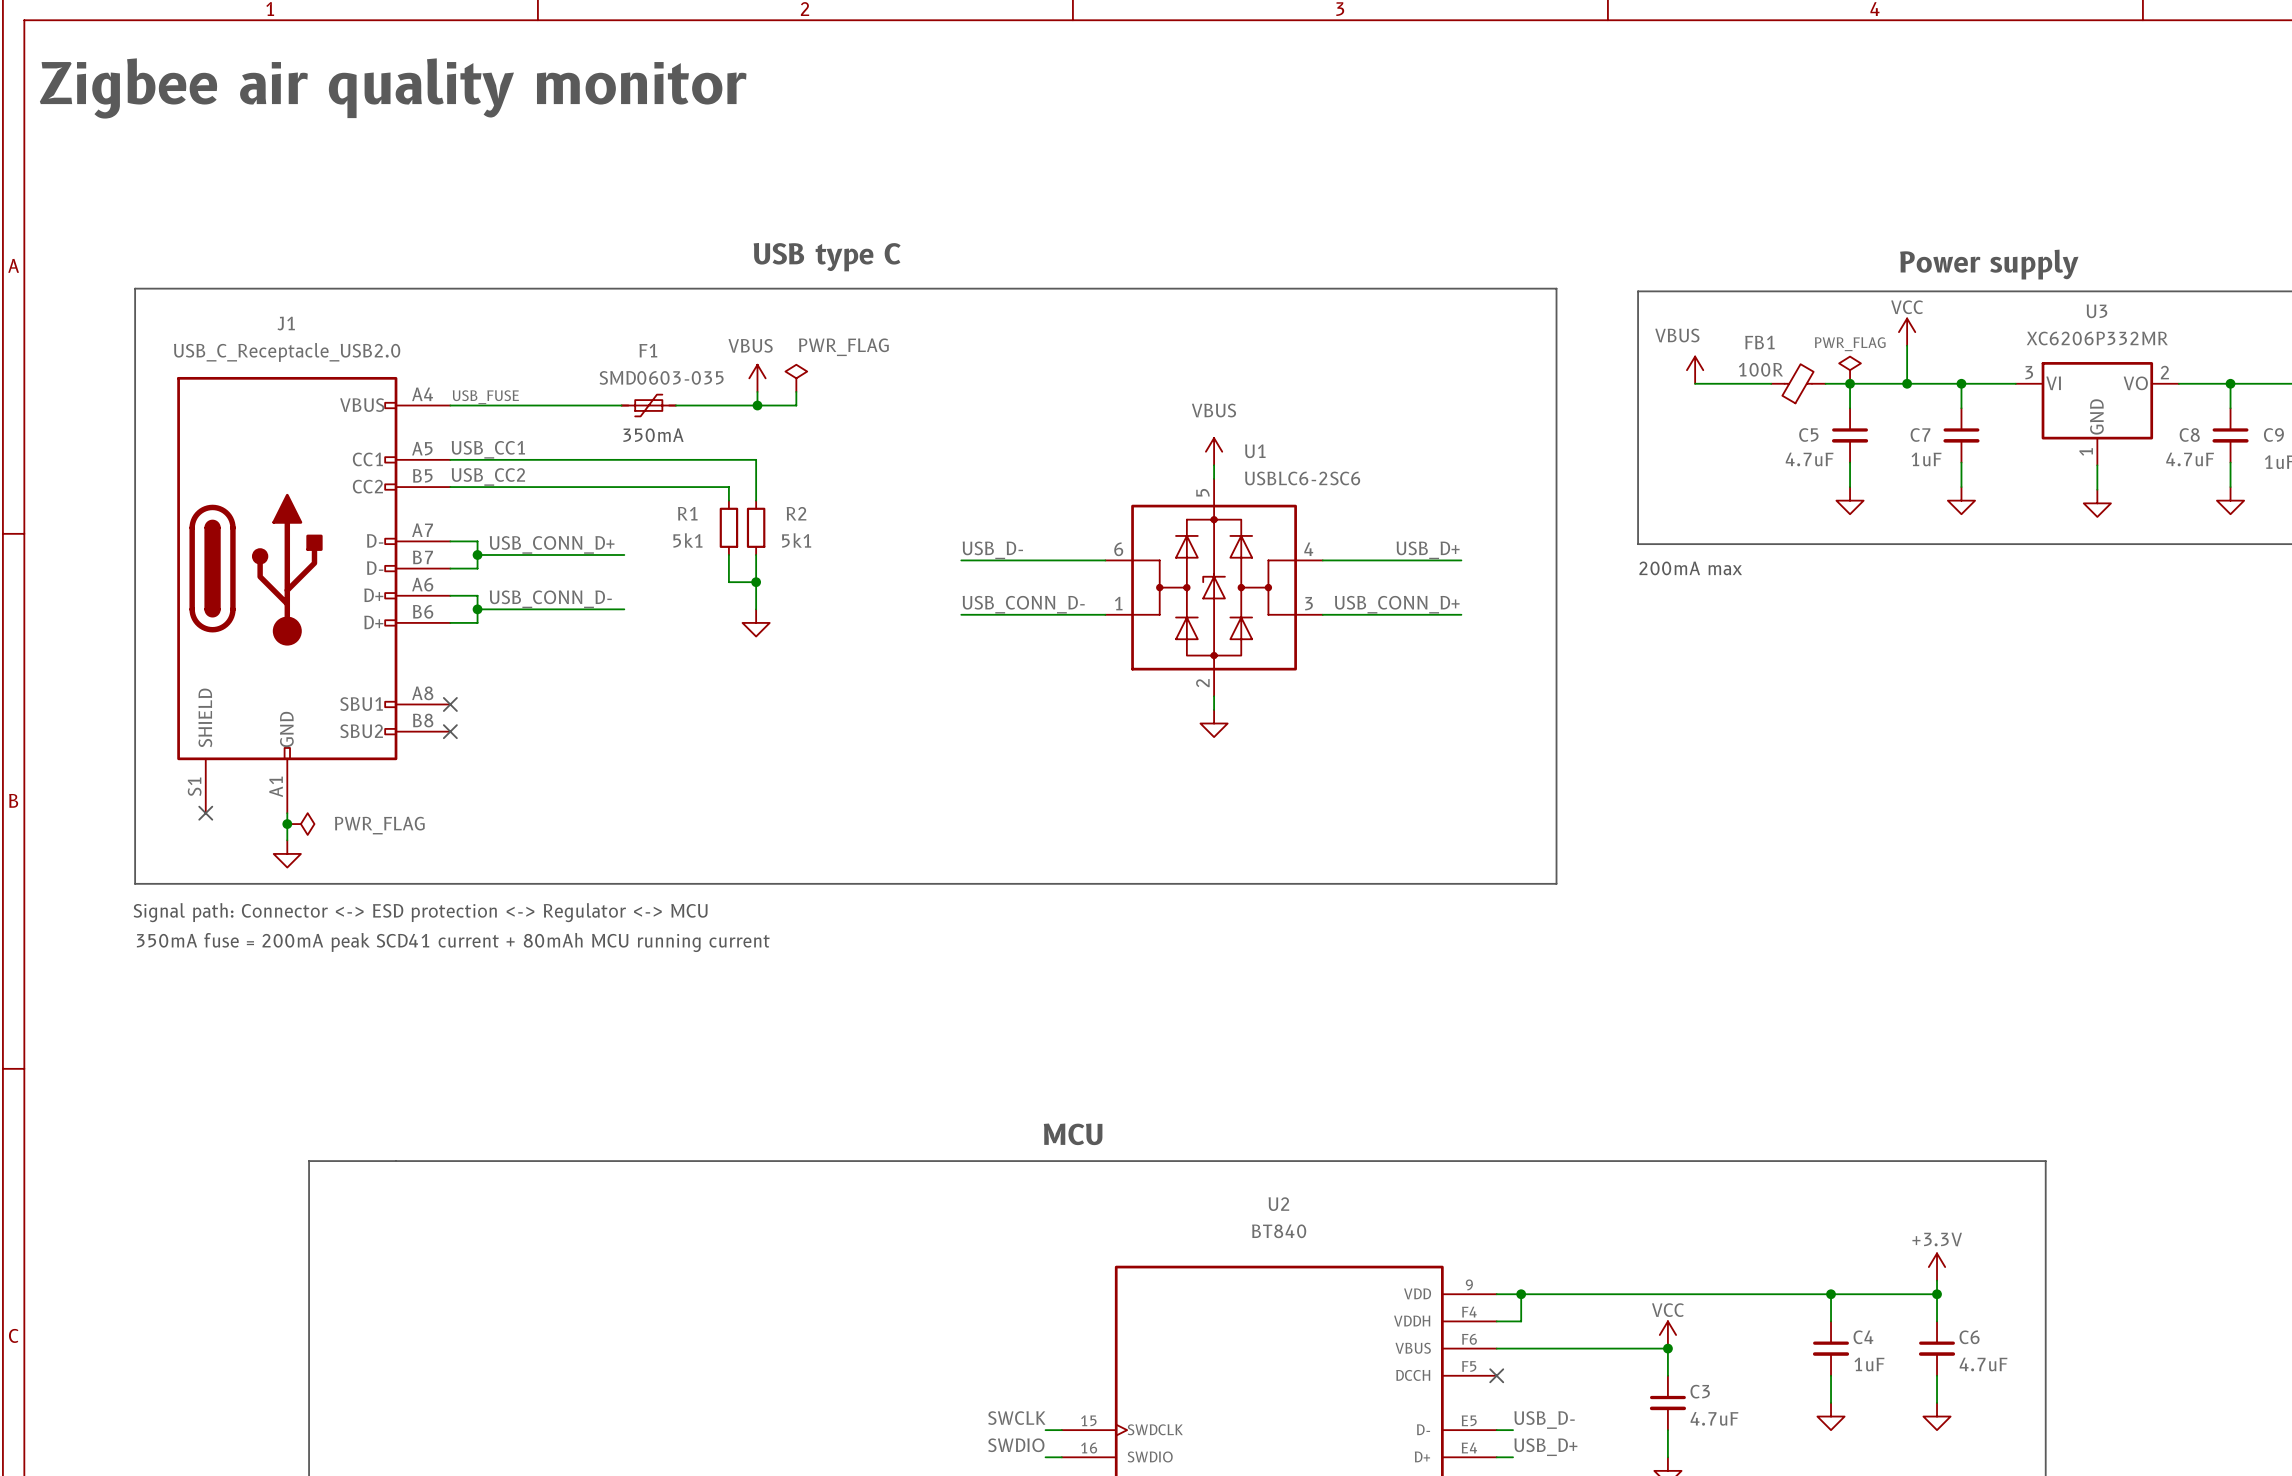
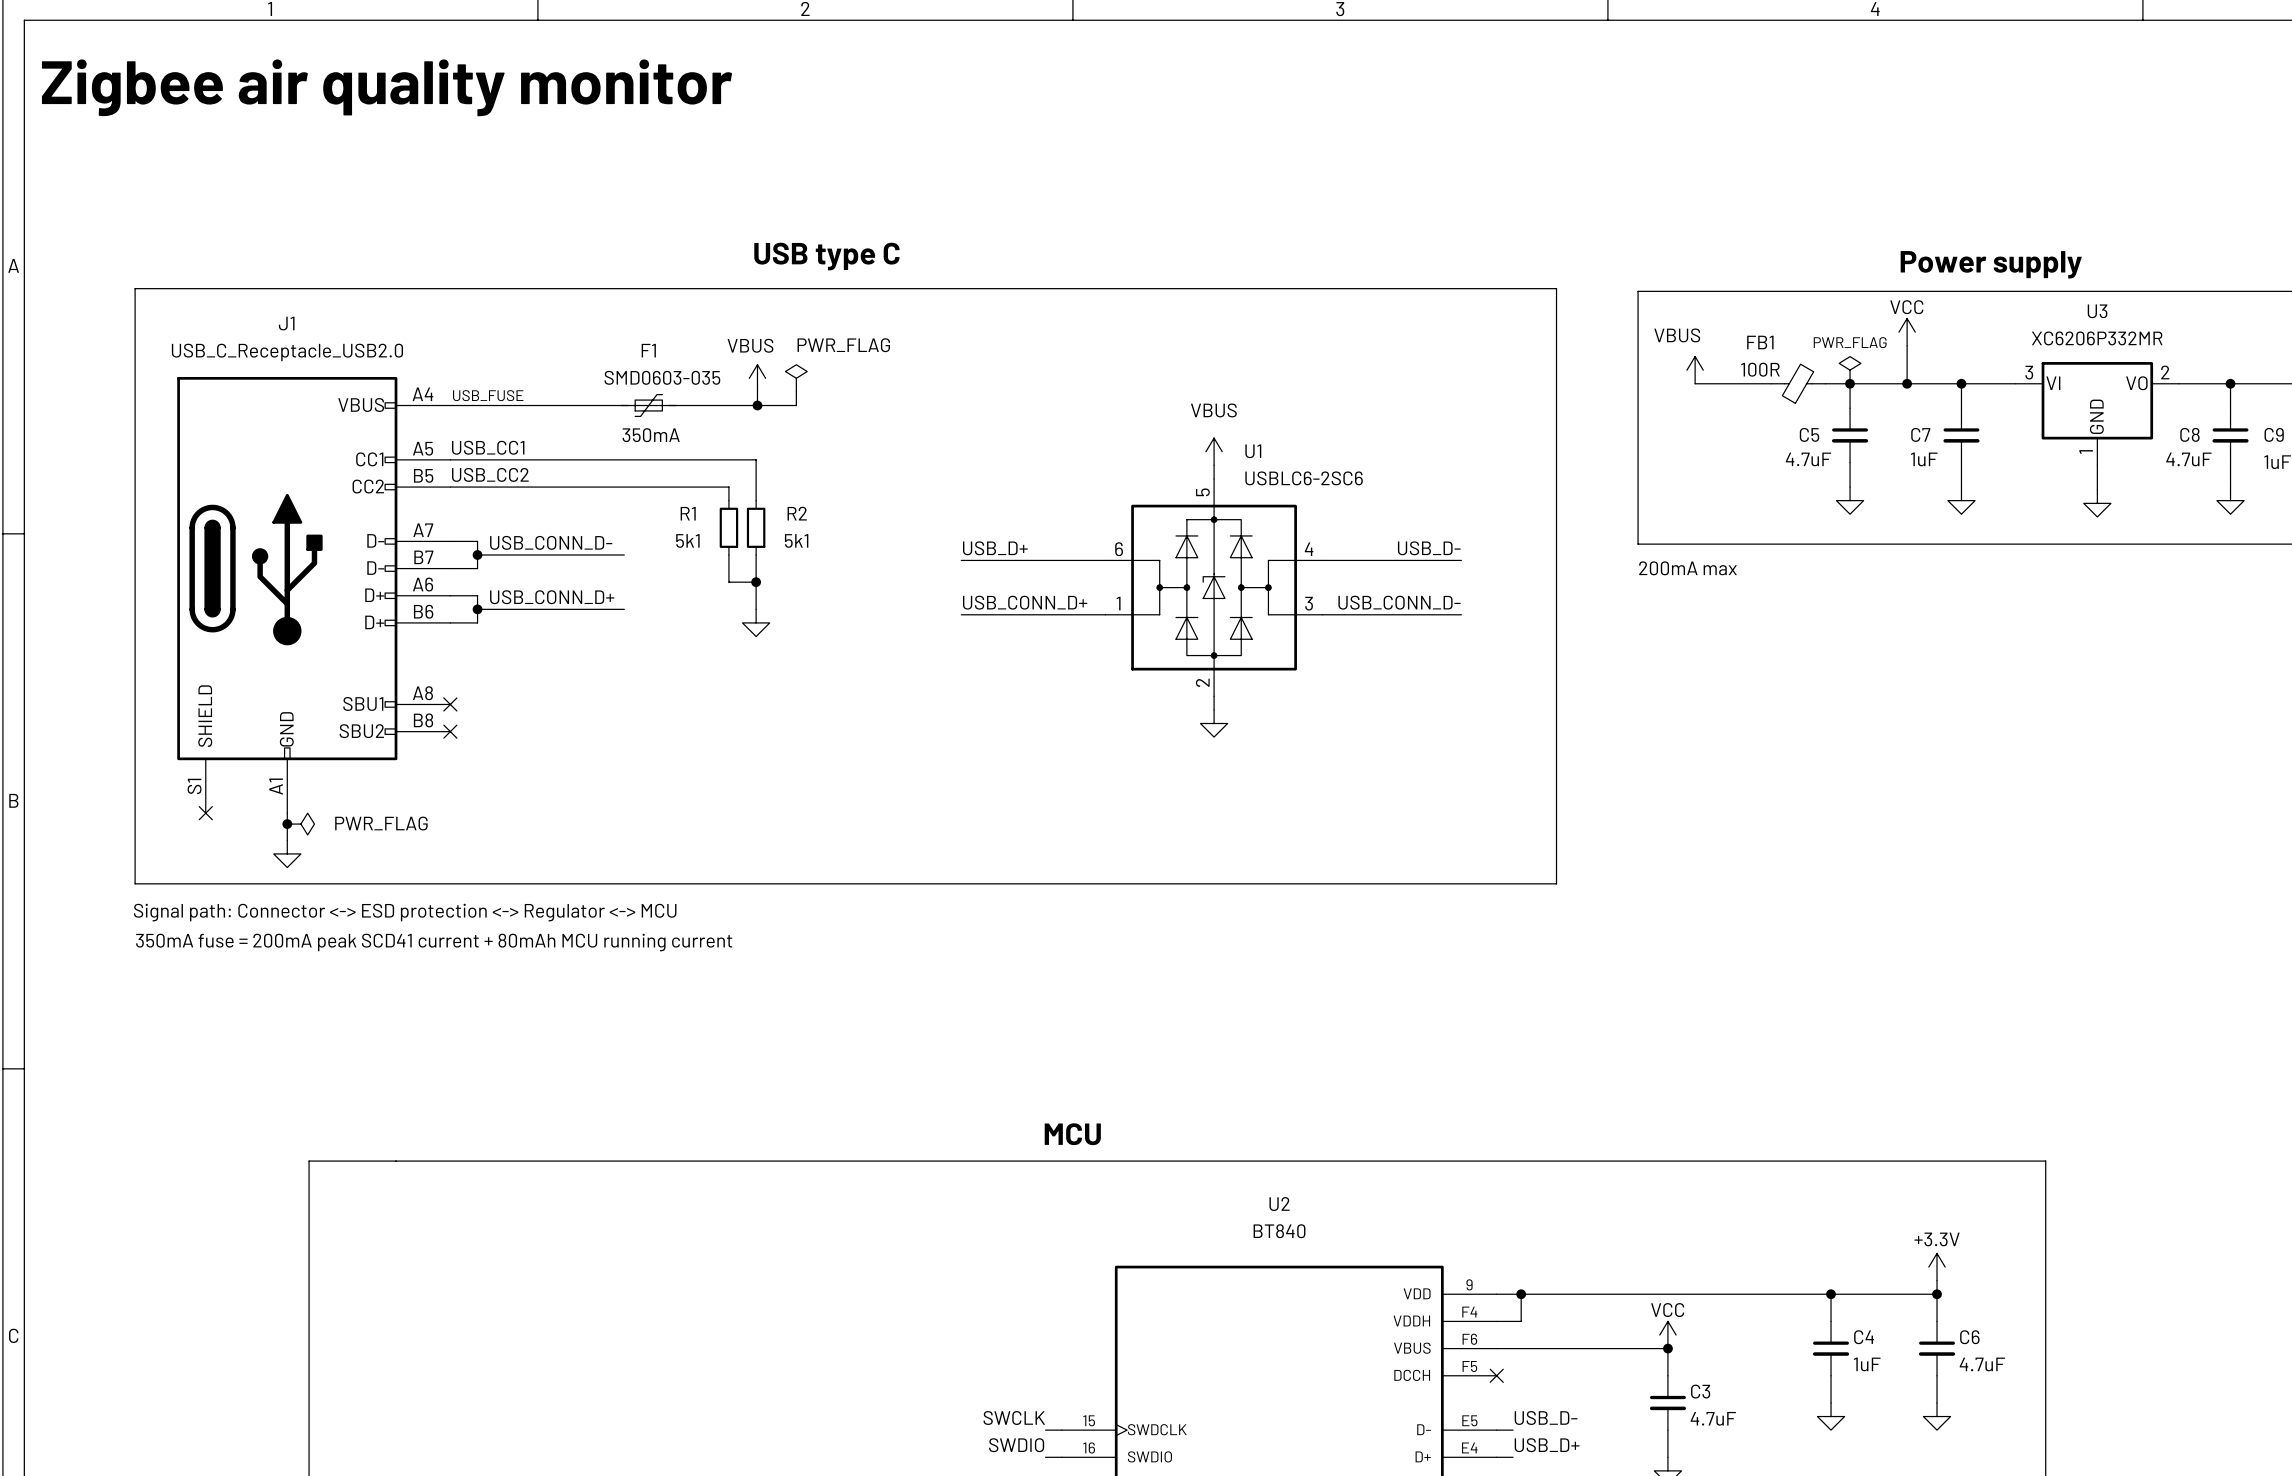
label: USB_CONN_D+ (552, 544) -> USB_CONN_D- (551, 542)
label: USB_D- (992, 550) -> USB_D+ (995, 548)
label: USB_D+ (1428, 550) -> USB_D- (1429, 548)
label: USB_CONN_D- (550, 599) -> USB_CONN_D+ (552, 597)
label: USB_CONN_D- (1023, 604) -> USB_CONN_D+ (1025, 602)
label: USB_CONN_D+ (1397, 604) -> USB_CONN_D- (1399, 602)

